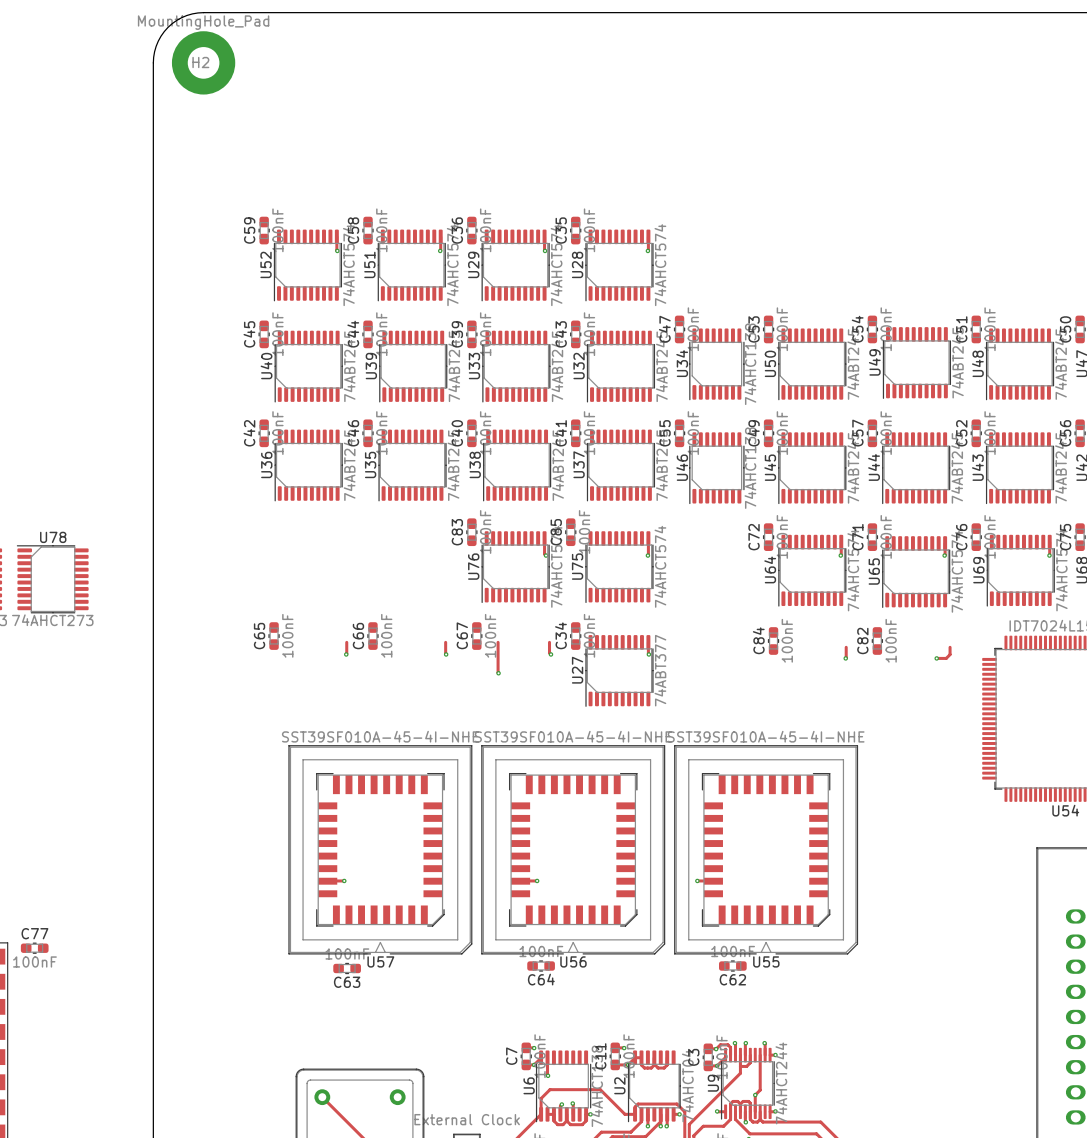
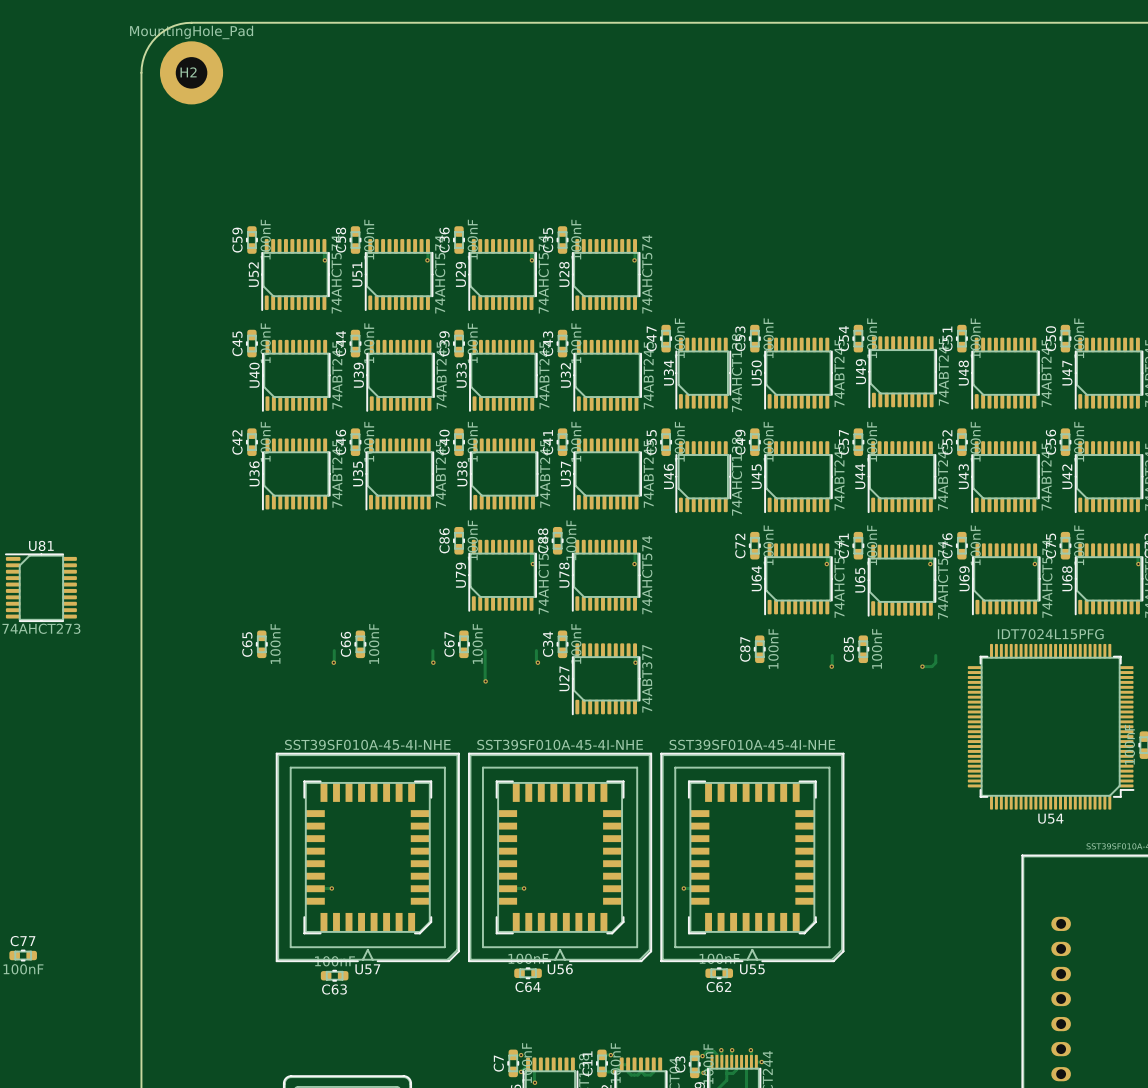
C83 name: C83 (457, 532) -> C86 (444, 540)
C85 name: C85 (556, 532) -> C88 (543, 540)
U78 name: U78 (53, 537) -> U81 (41, 545)
U76 name: U76 (473, 566) -> U79 (460, 575)
U75 name: U75 (577, 566) -> U78 (564, 575)
C84 name: C84 (758, 640) -> C87 (745, 649)
C82 name: C82 (862, 641) -> C85 (848, 649)

